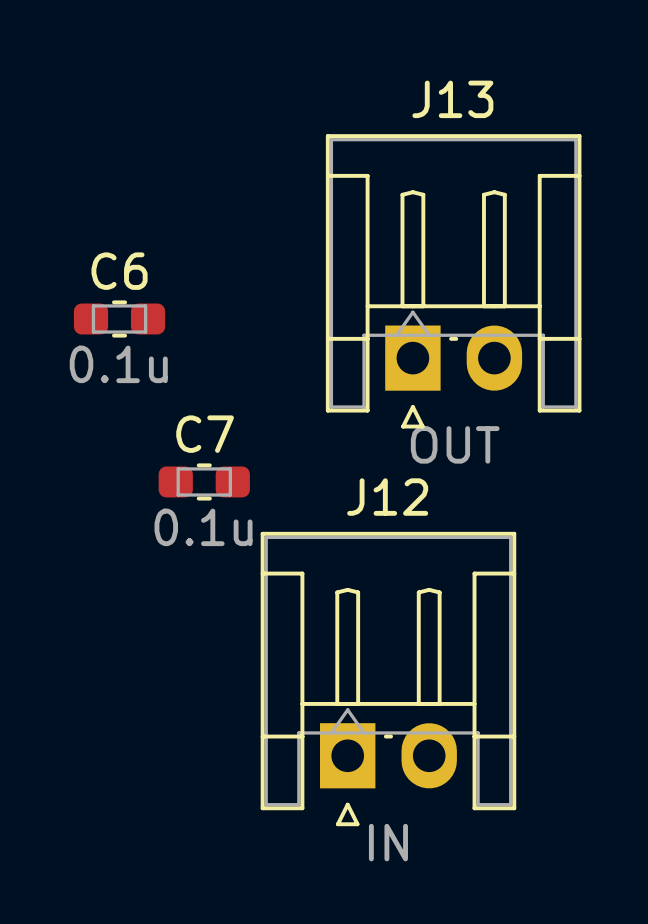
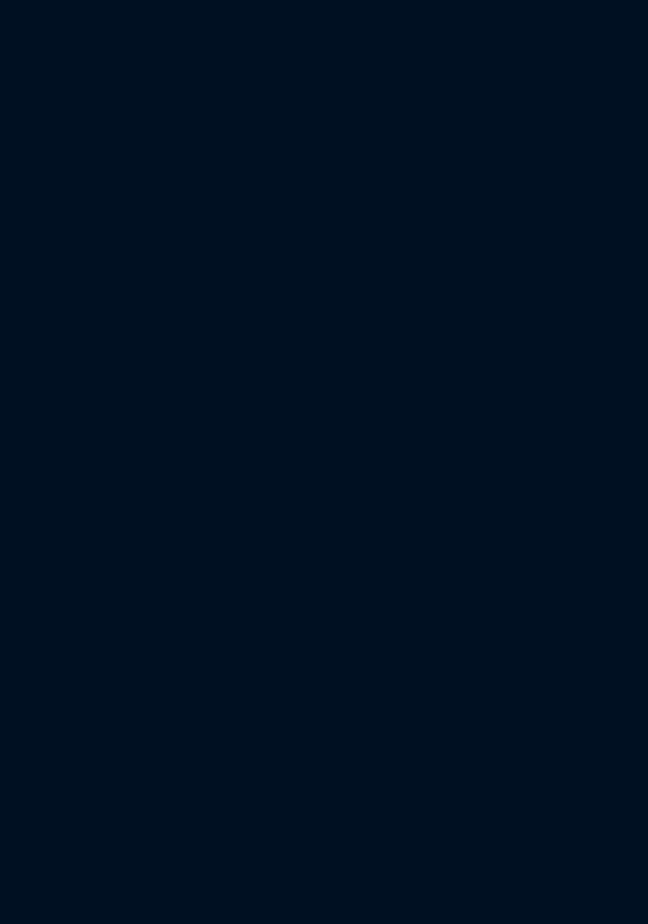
J13: OUT (453, 281) -> none
C6: 0.1u (119, 318) -> none
C7: 0.1u (204, 481) -> none
J12: IN (388, 679) -> none

